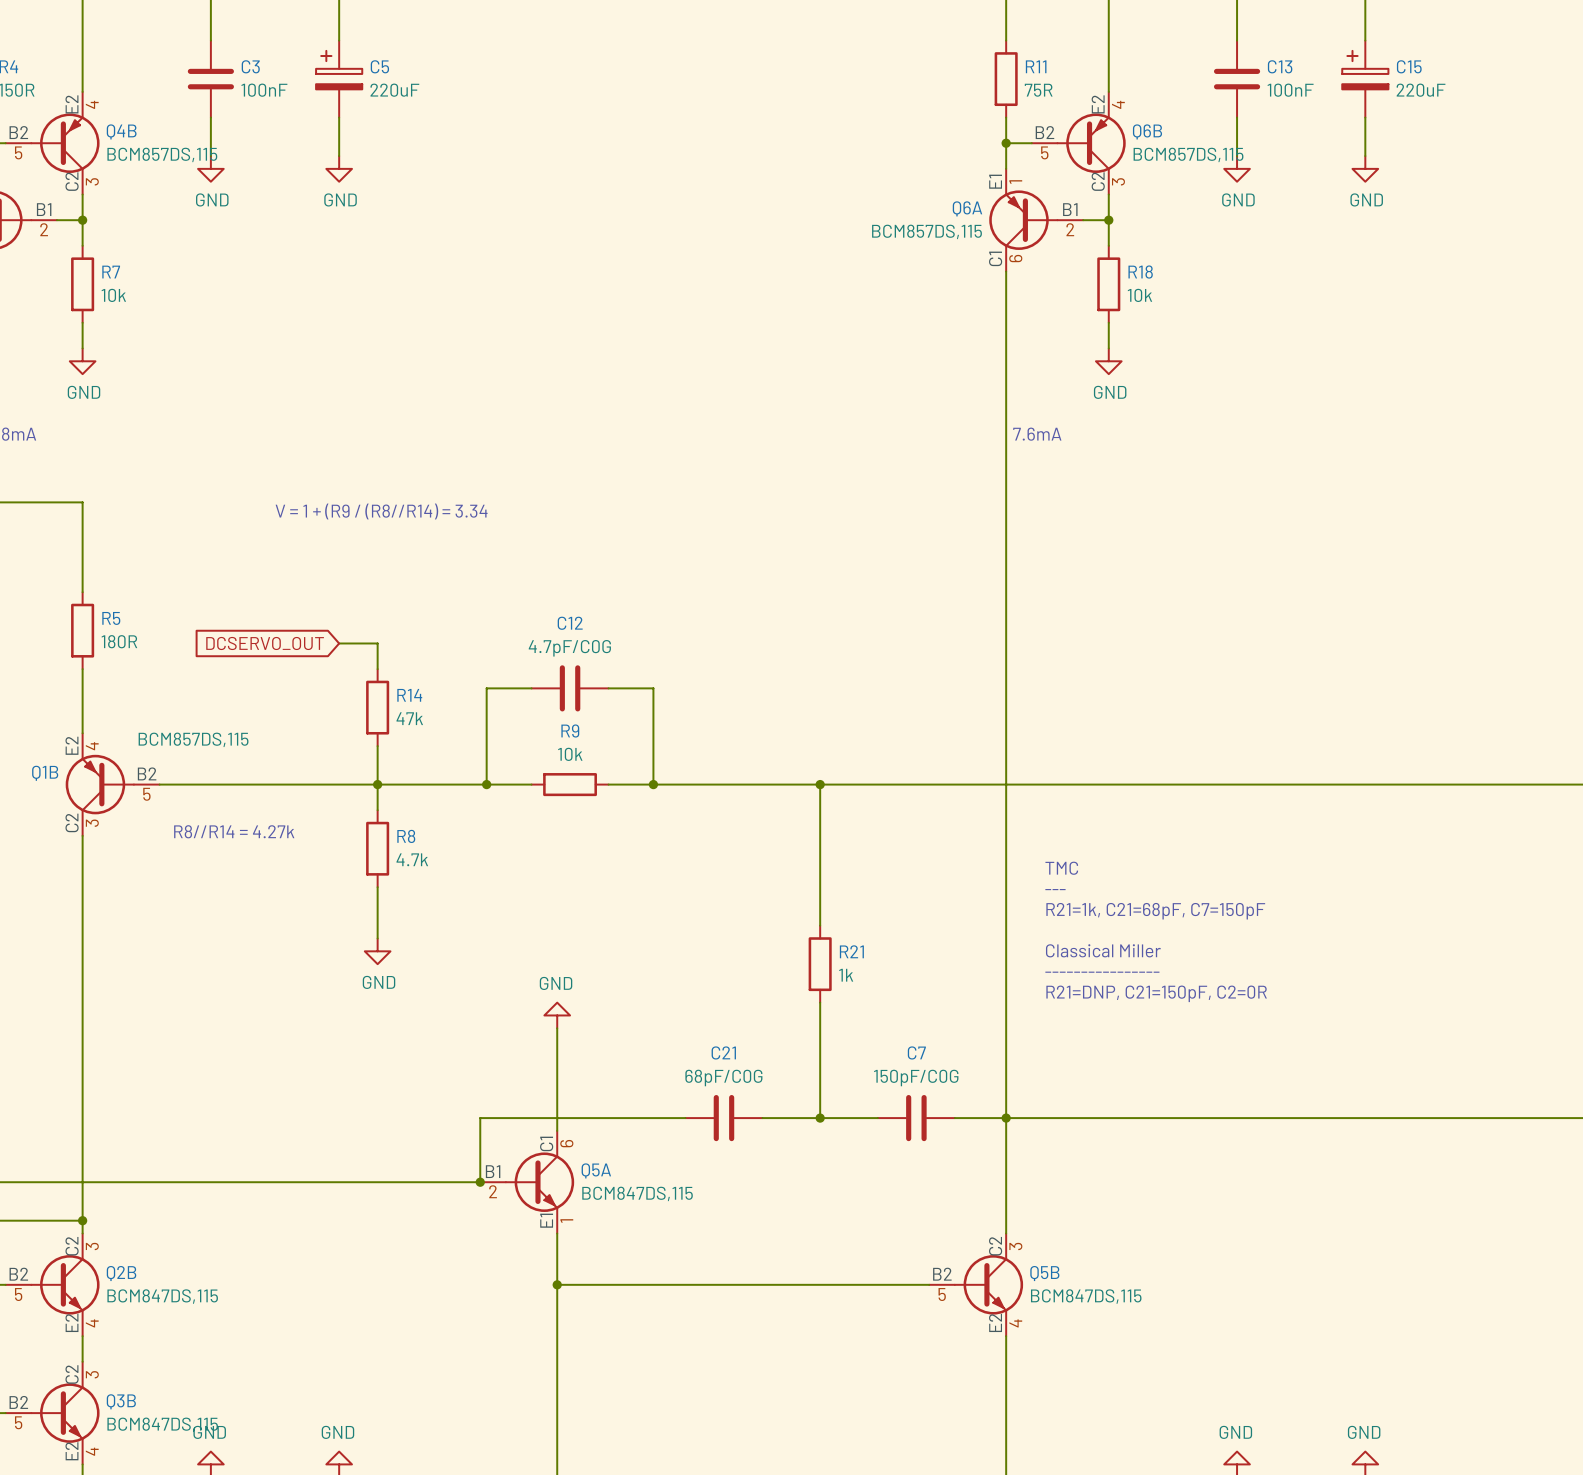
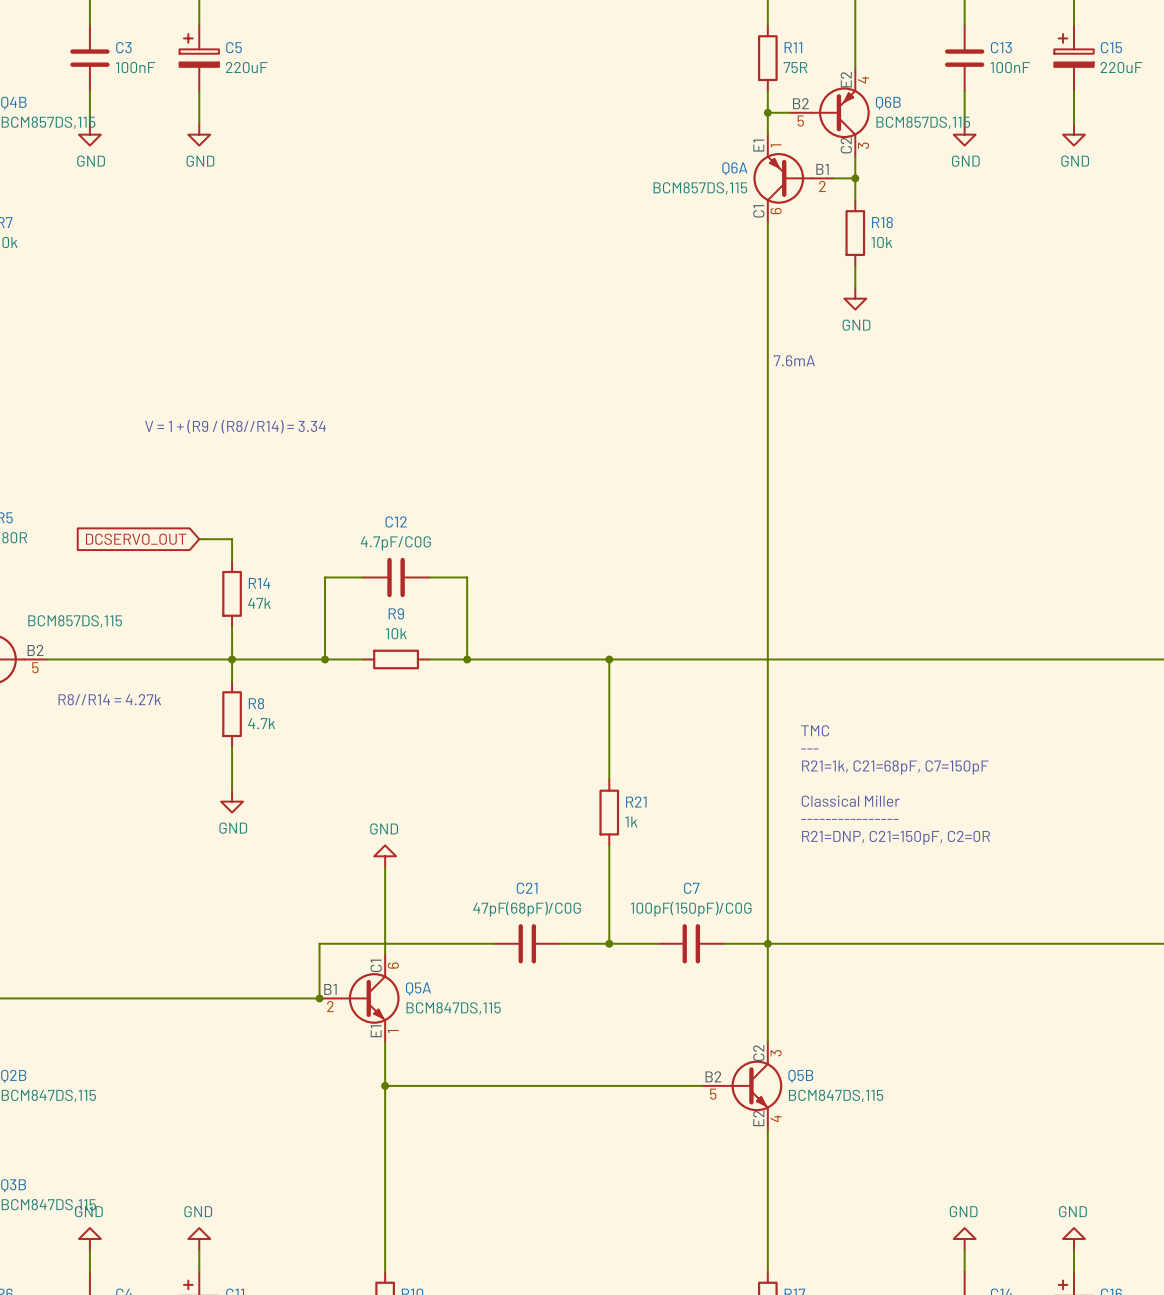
C21 value: 68pF/C0G (723, 1077) -> 47pF(68pF)/C0G (527, 909)
C7 value: 150pF/C0G (916, 1077) -> 100pF(150pF)/C0G (691, 909)

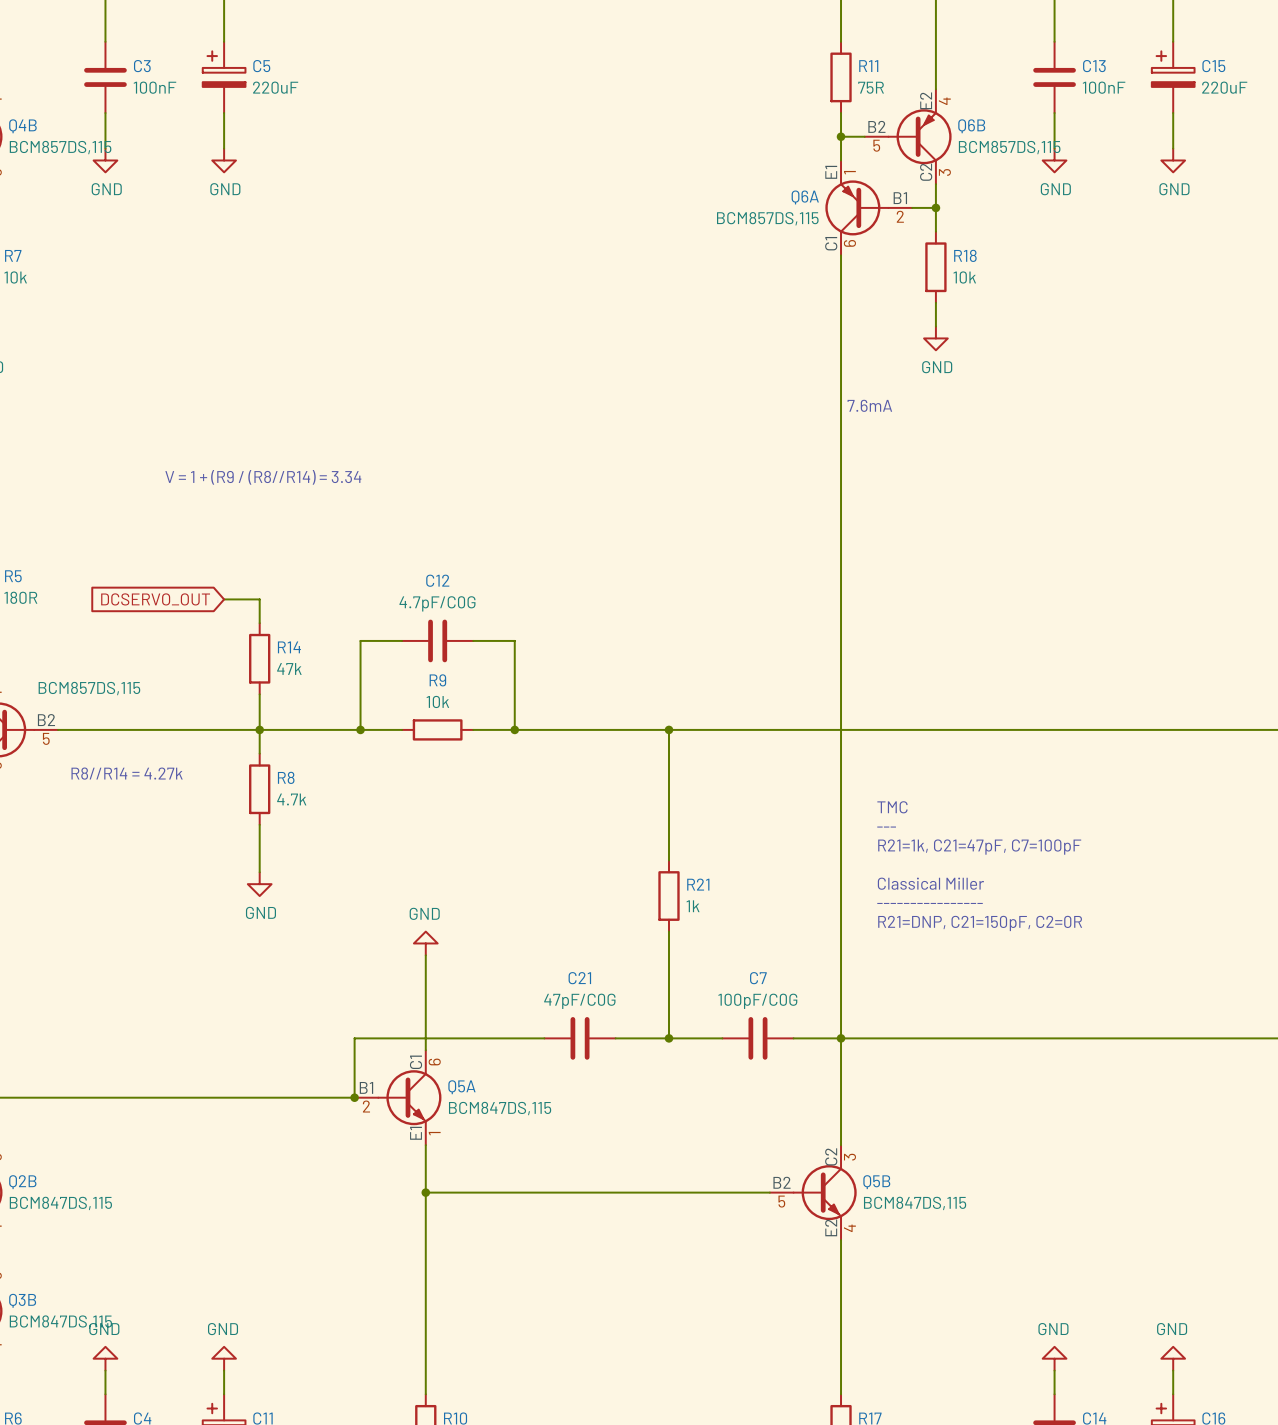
text: R21=1k, C21=68pF, C7=150pF (895, 767) -> R21=1k, C21=47pF, C7=100pF (979, 847)
C21 value: 47pF(68pF)/C0G (527, 909) -> 47pF/C0G (579, 1001)
C7 value: 100pF(150pF)/C0G (691, 909) -> 100pF/C0G (757, 1001)

